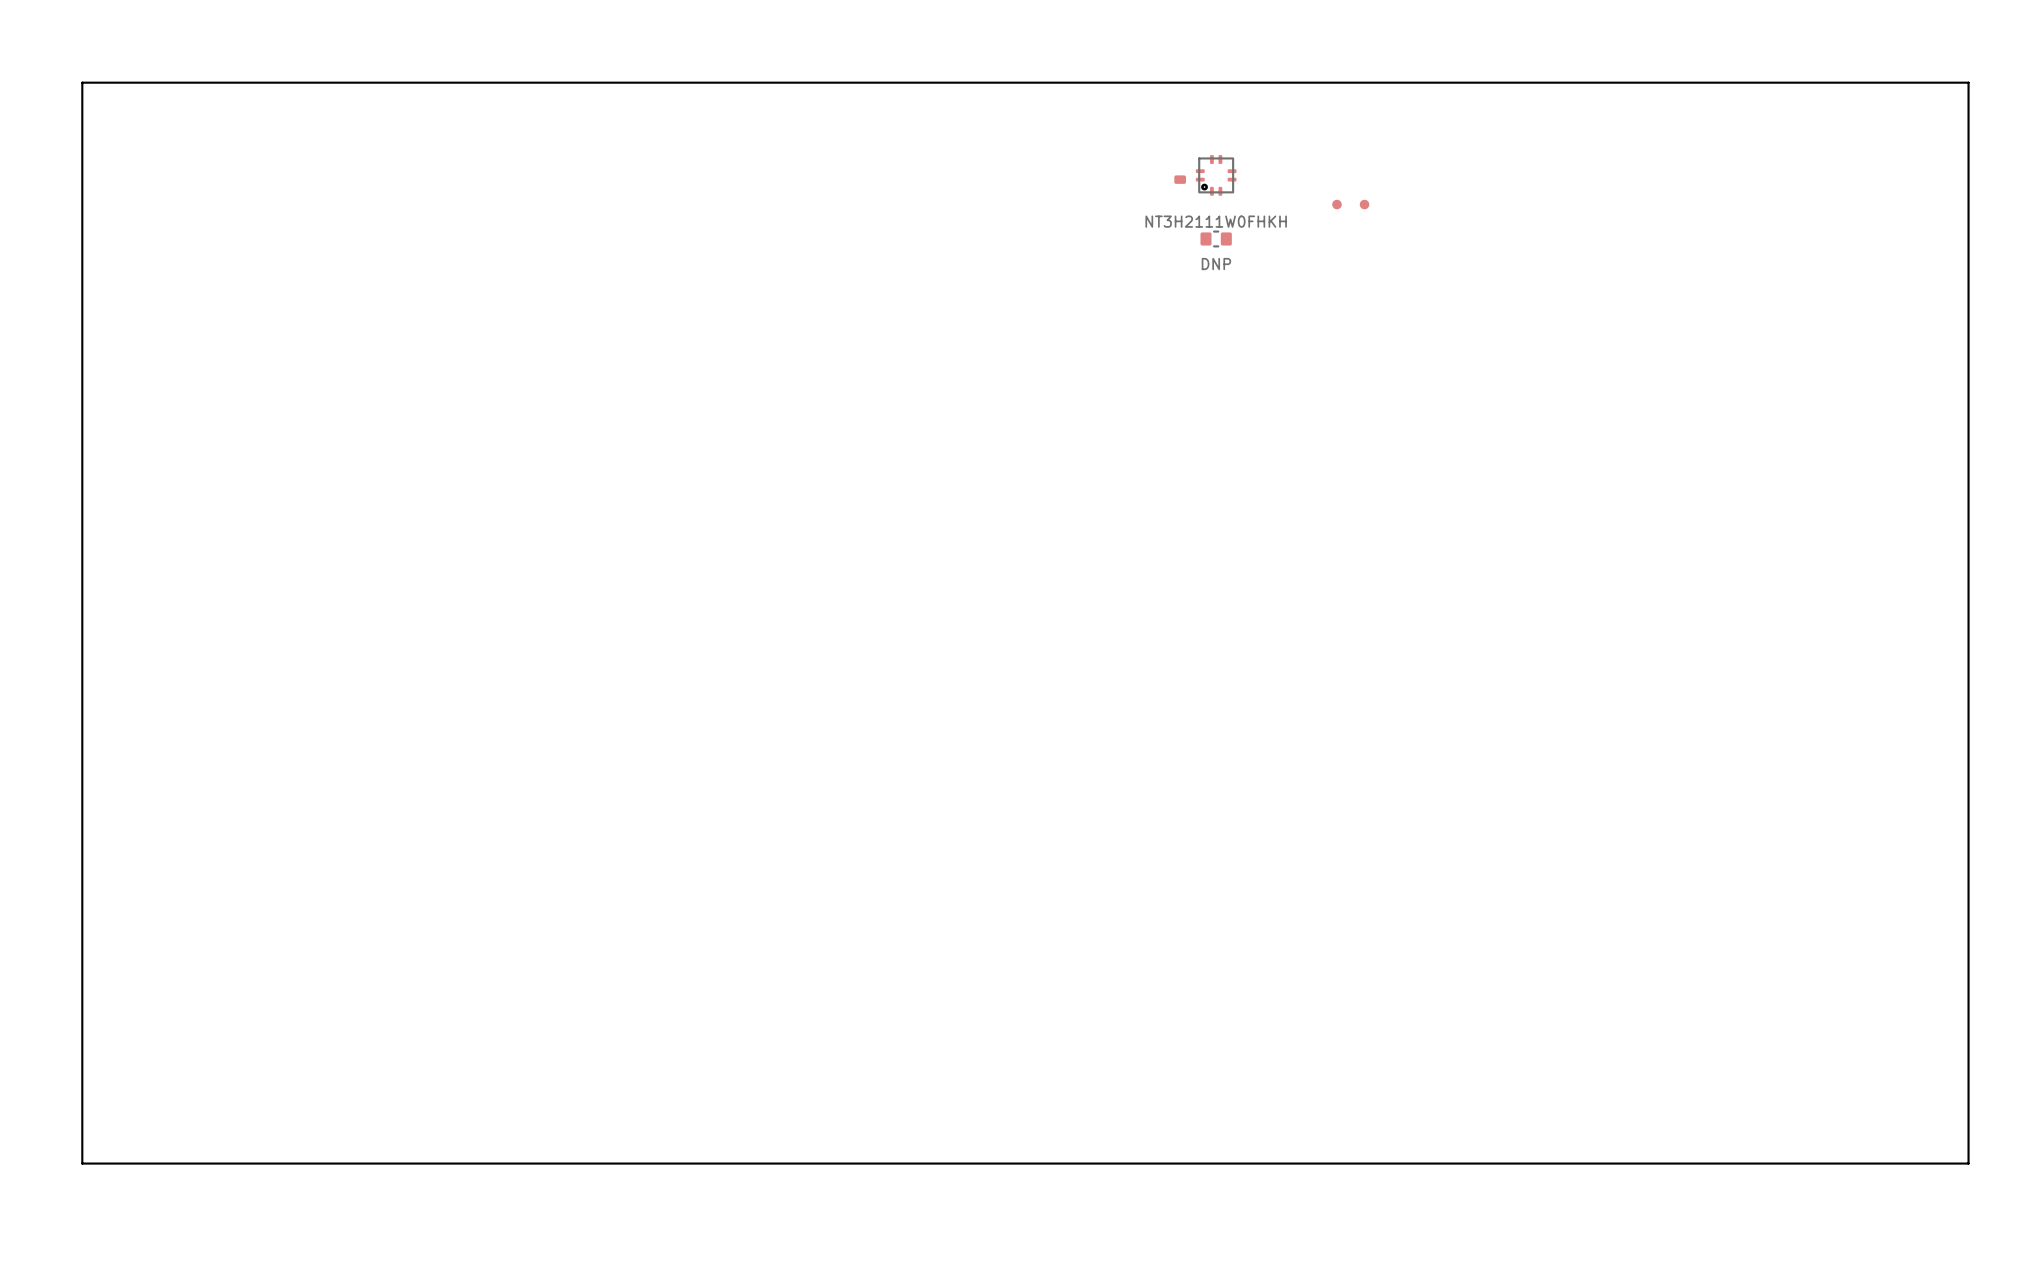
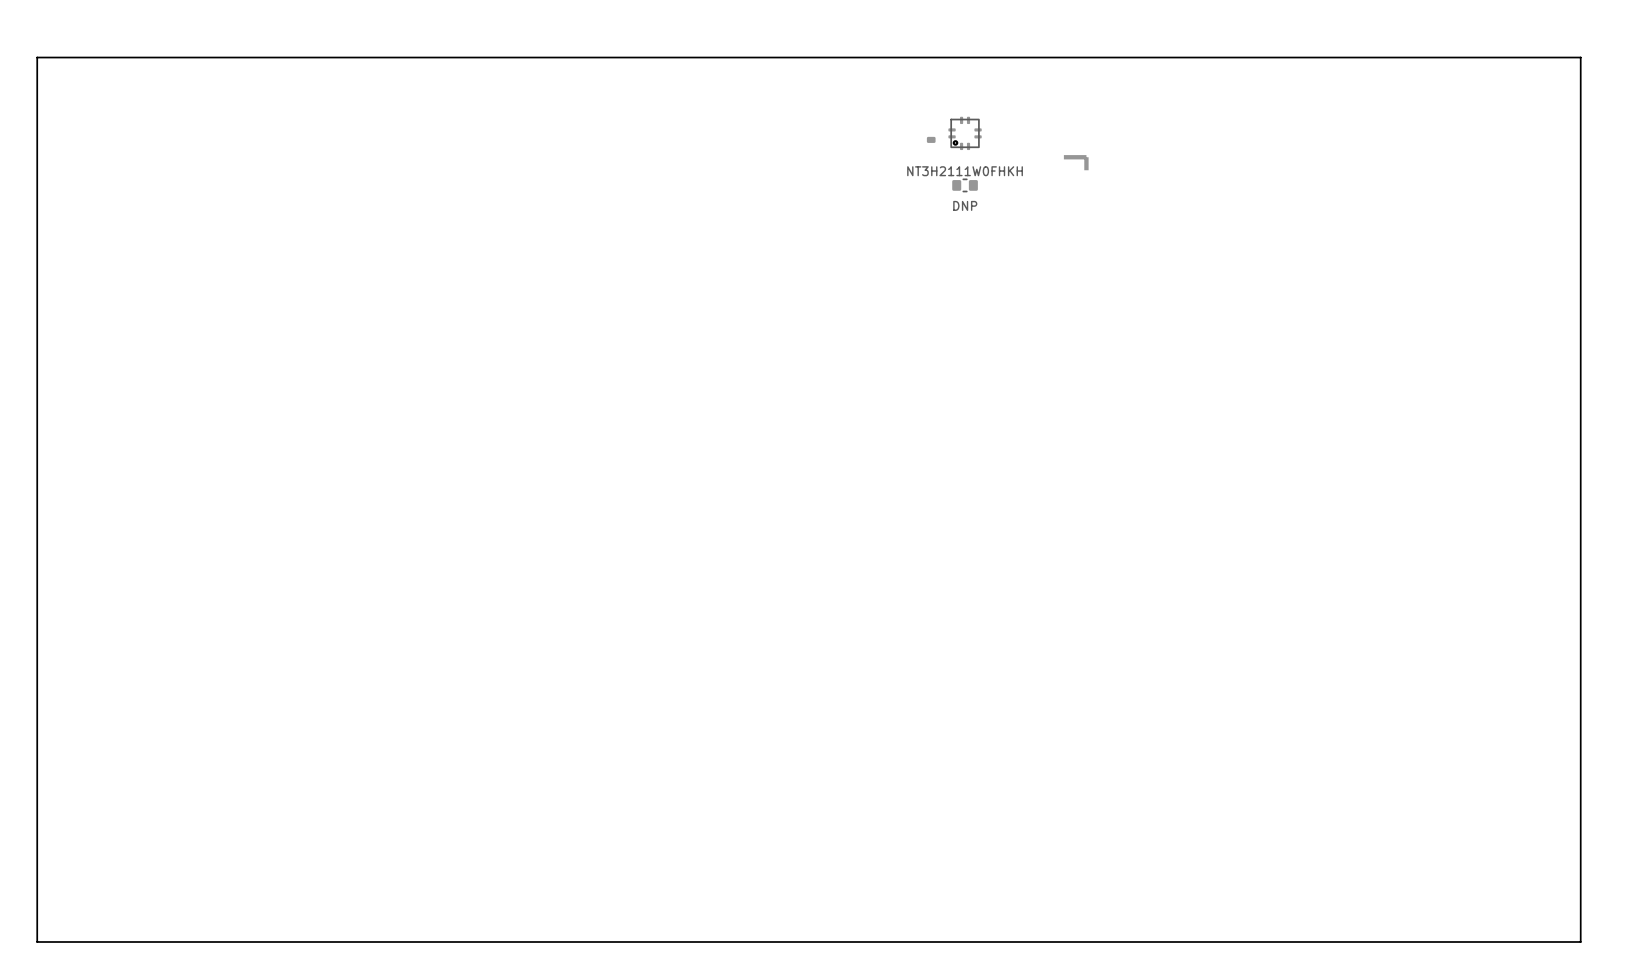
part footprint: [1174, 175, 1186, 184] -> [926, 136, 936, 143]
part footprint: [1332, 199, 1370, 210] -> [1063, 155, 1089, 171]

